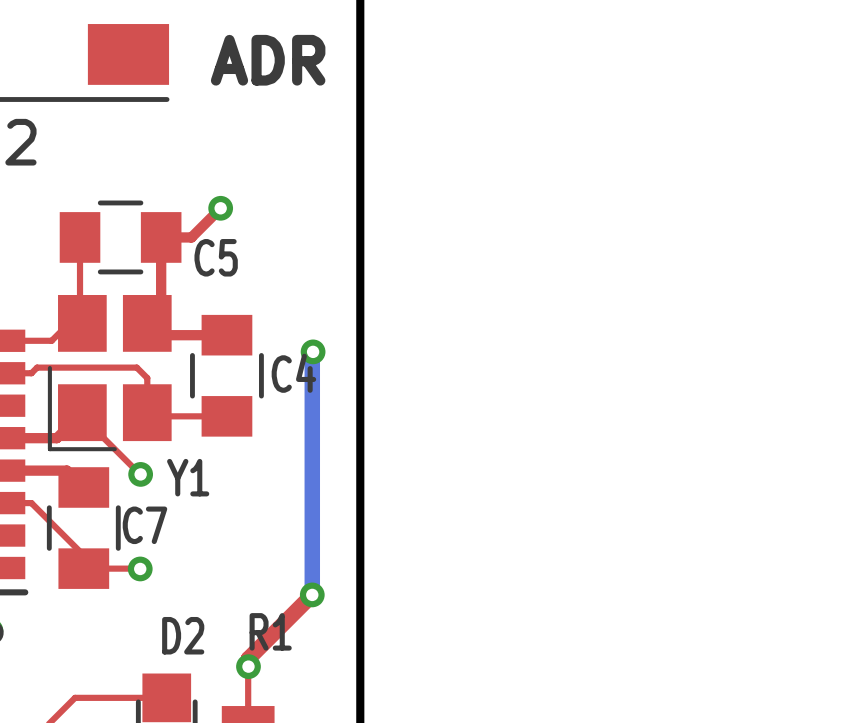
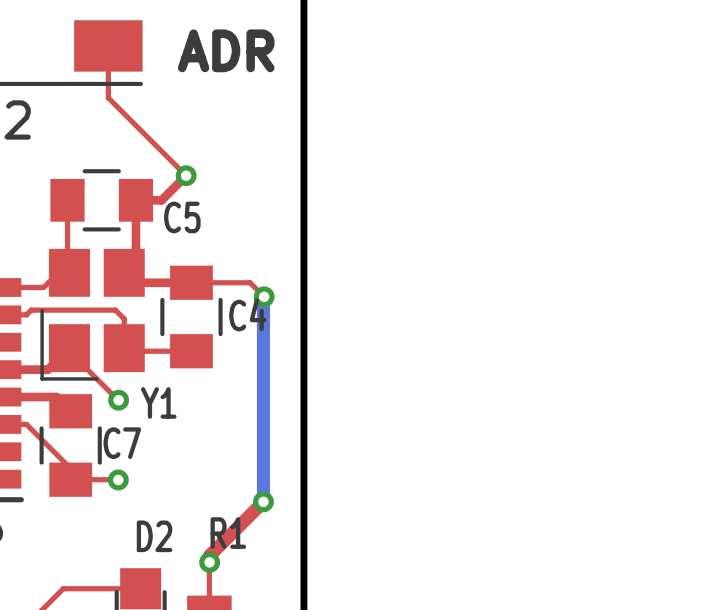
top track: none -> (108, 45) (108, 97) (186, 175)
top track: none -> (191, 282) (250, 282) (264, 296)

